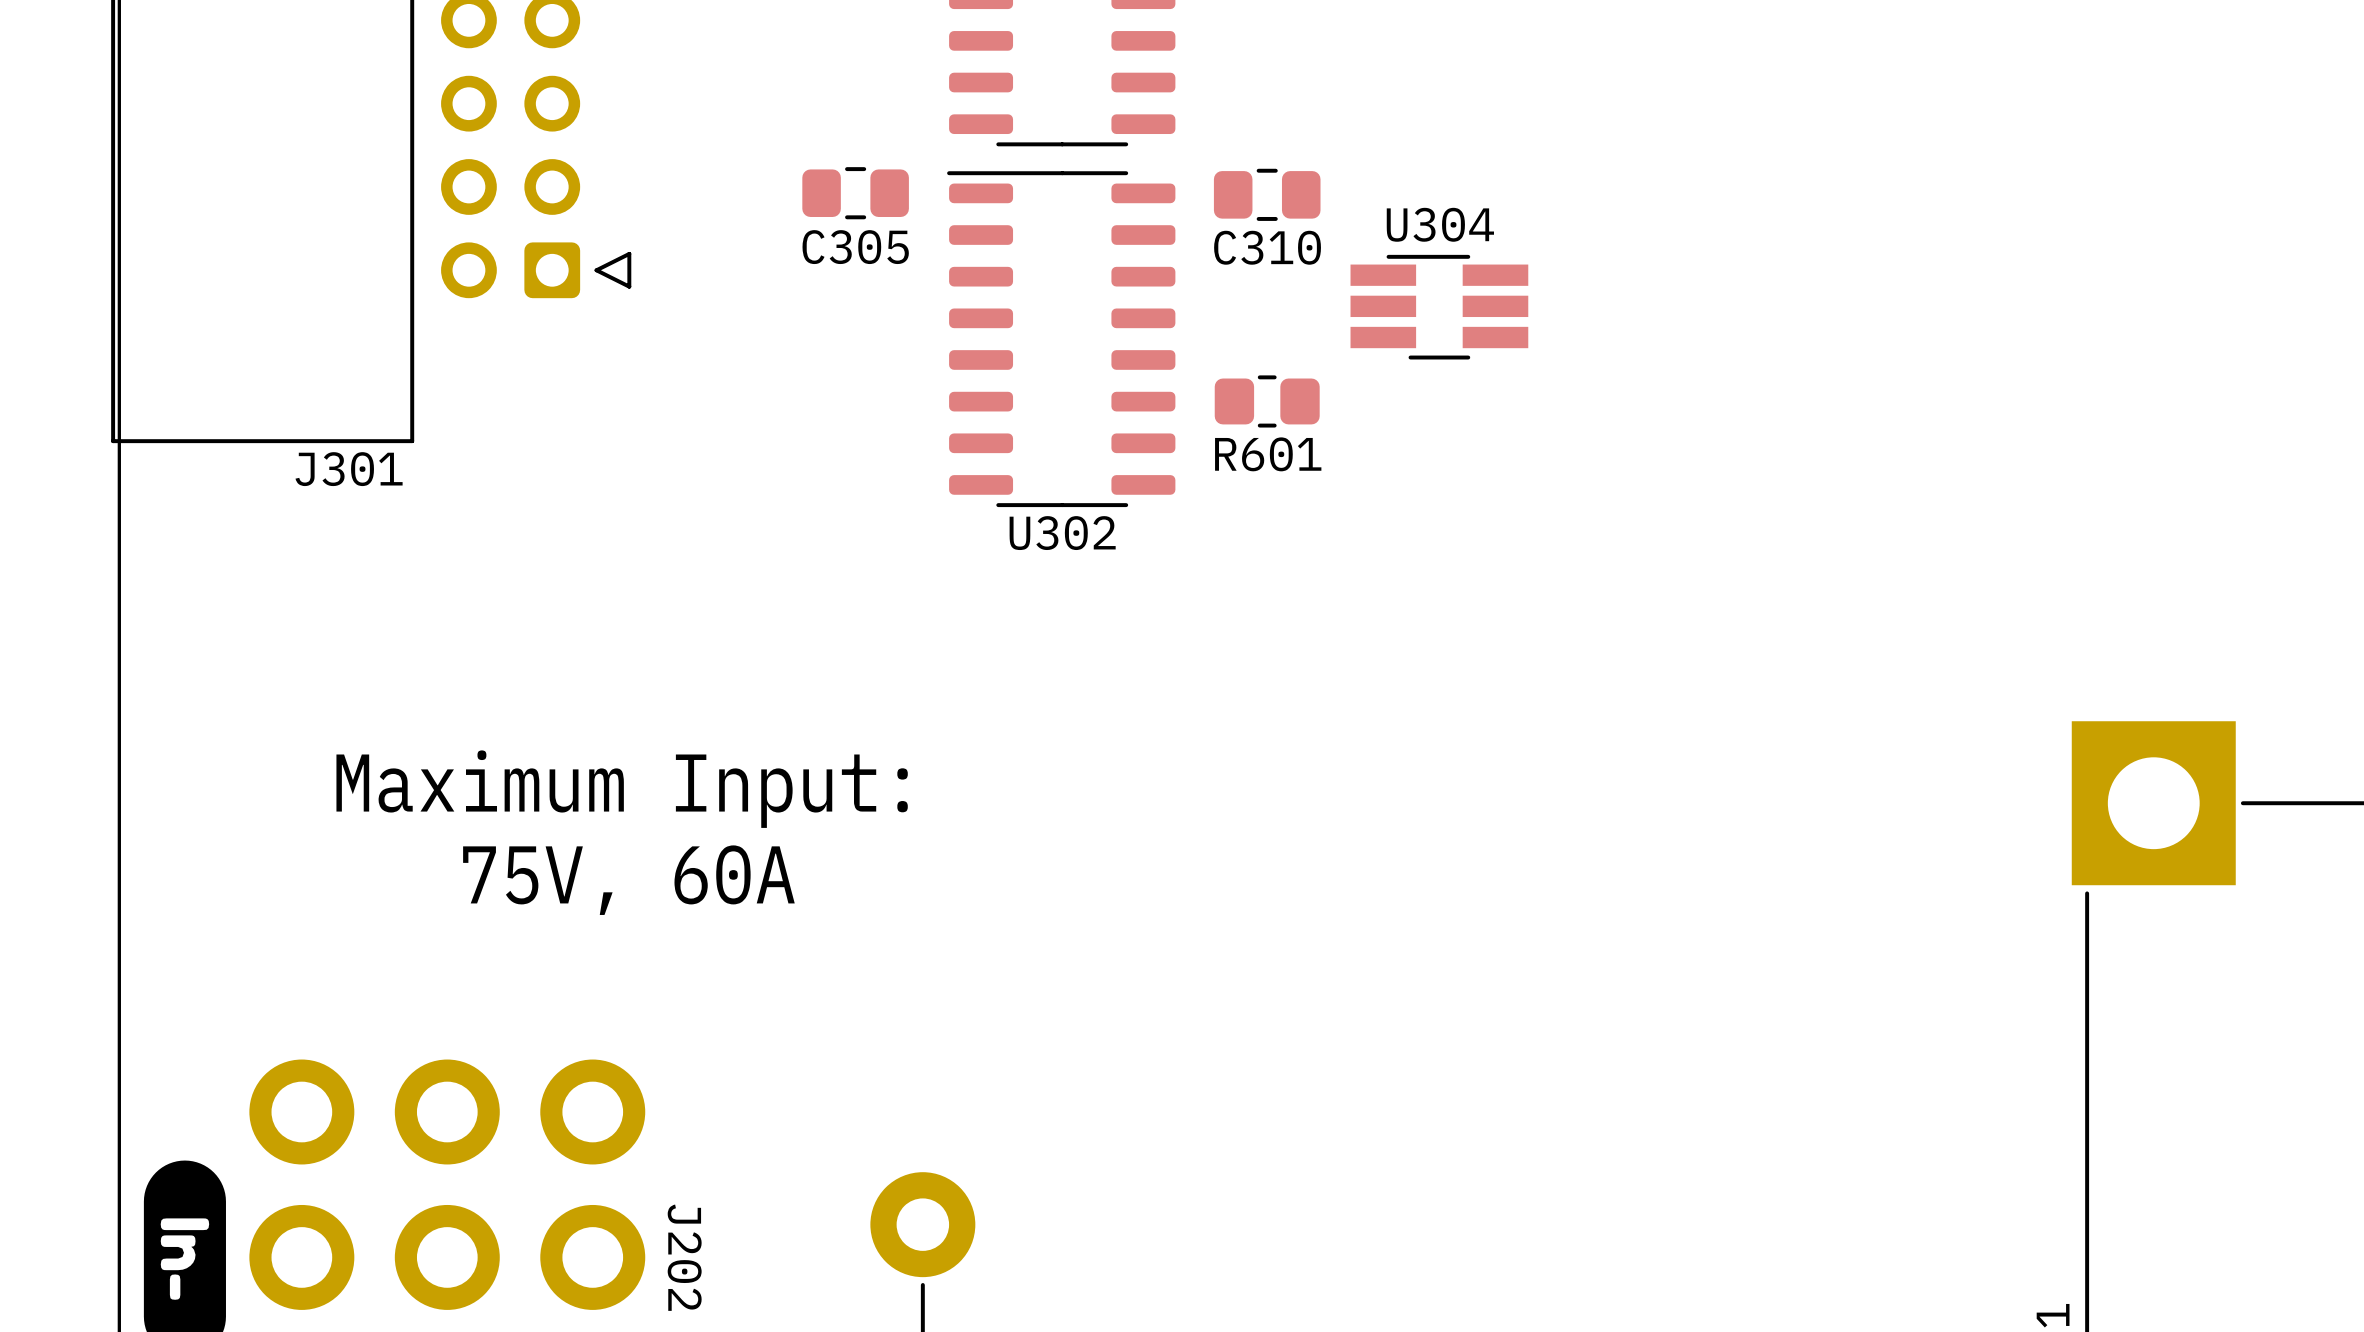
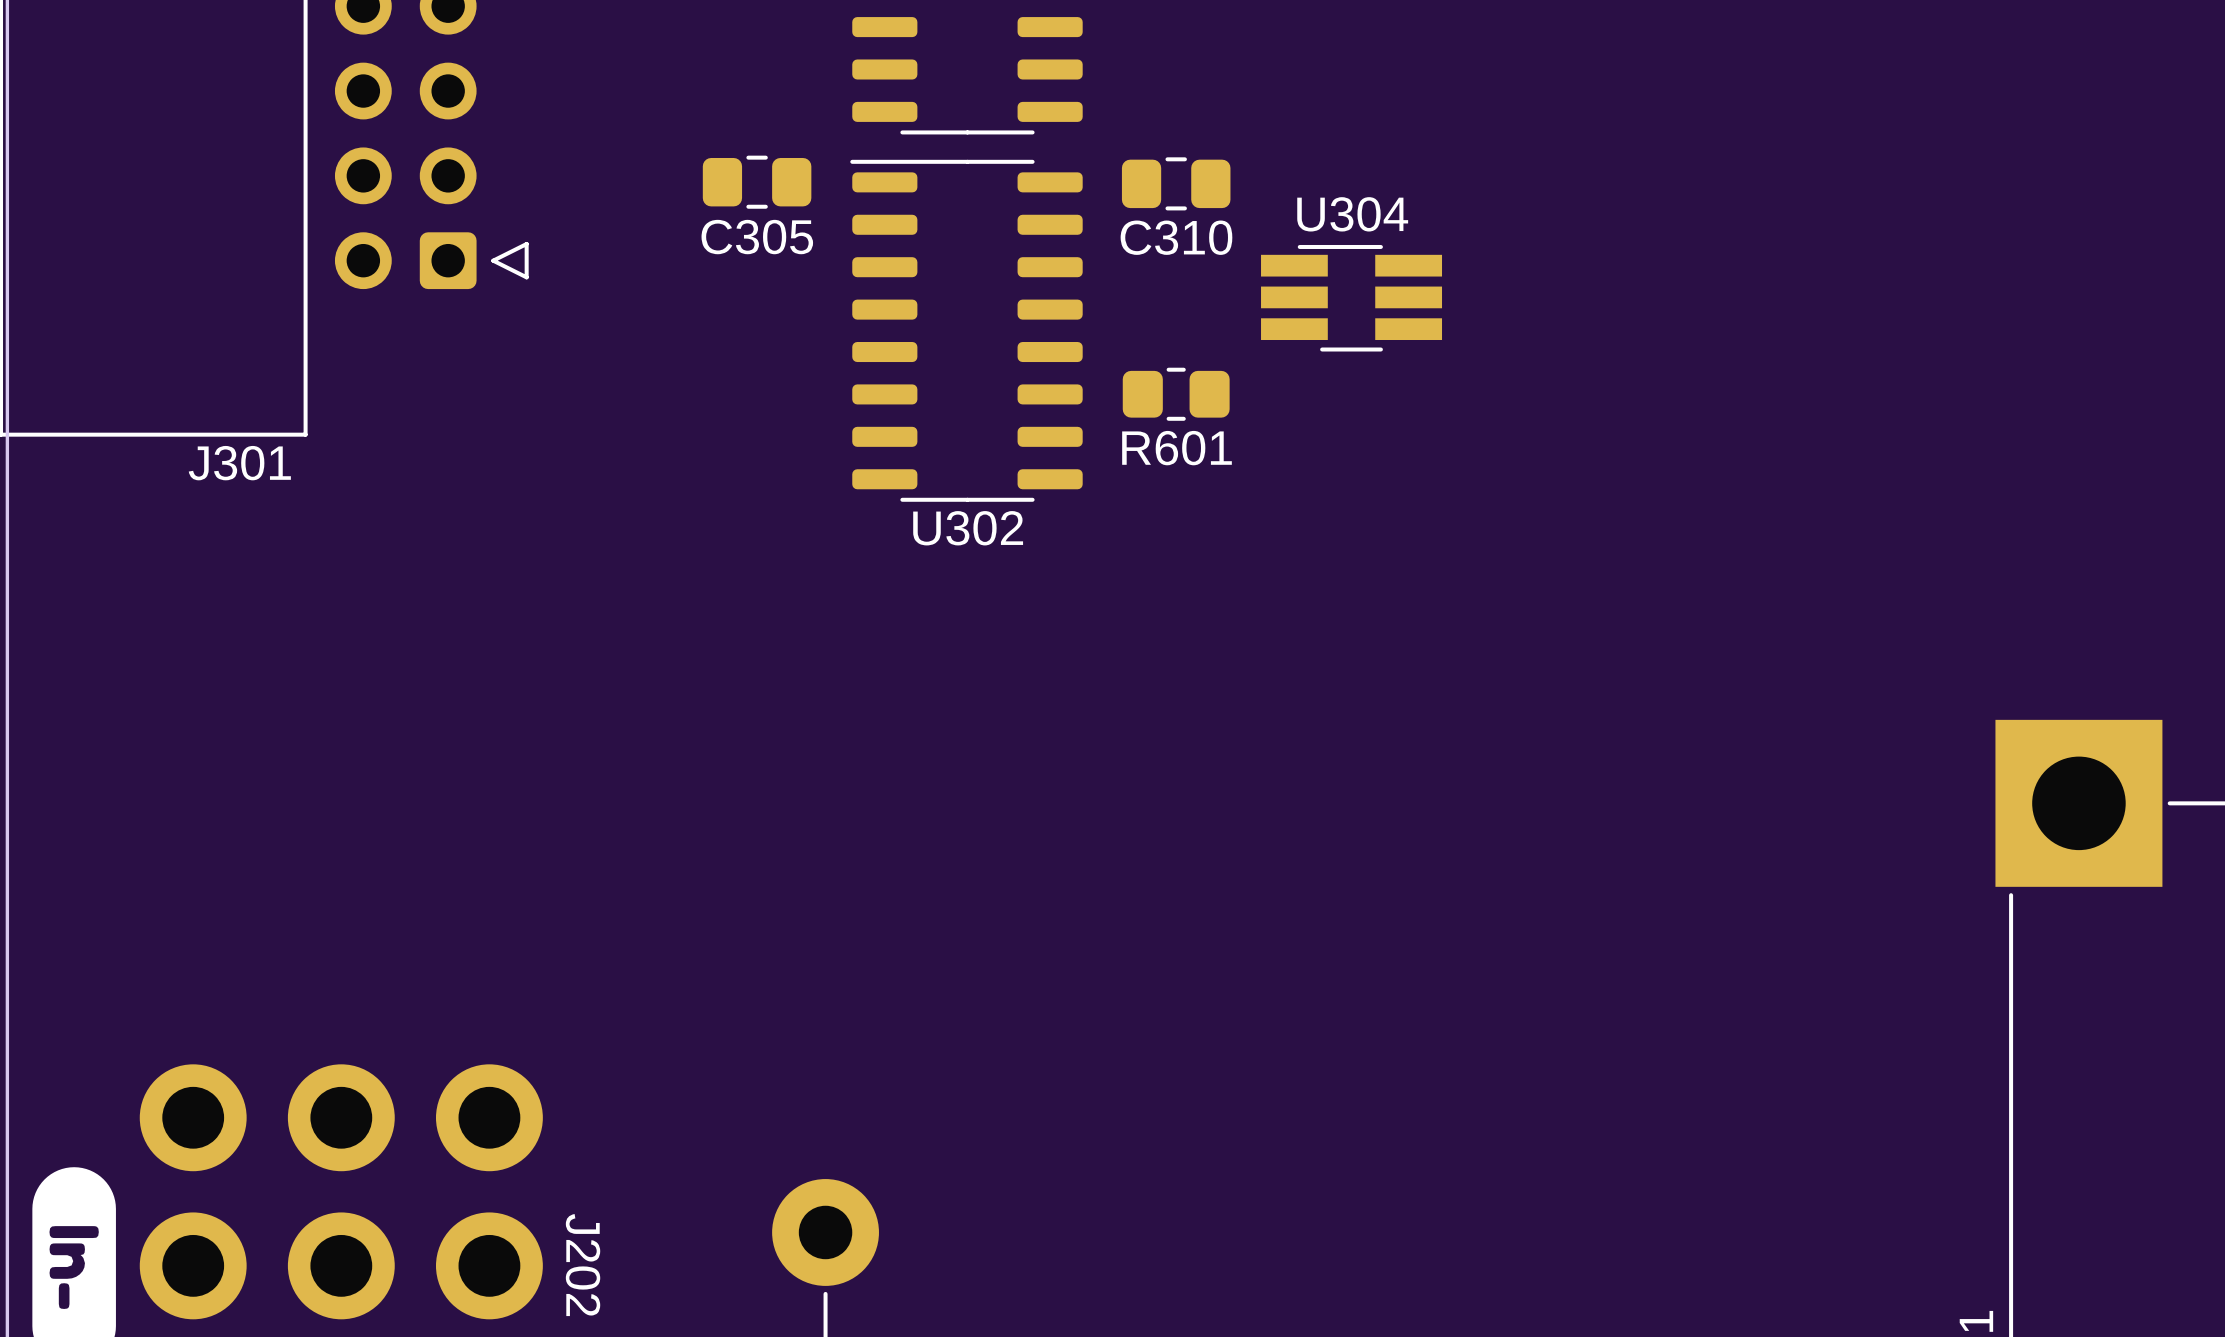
text: Maximum Input: (622, 789) -> none
text: 75V, 60A (628, 880) -> none

